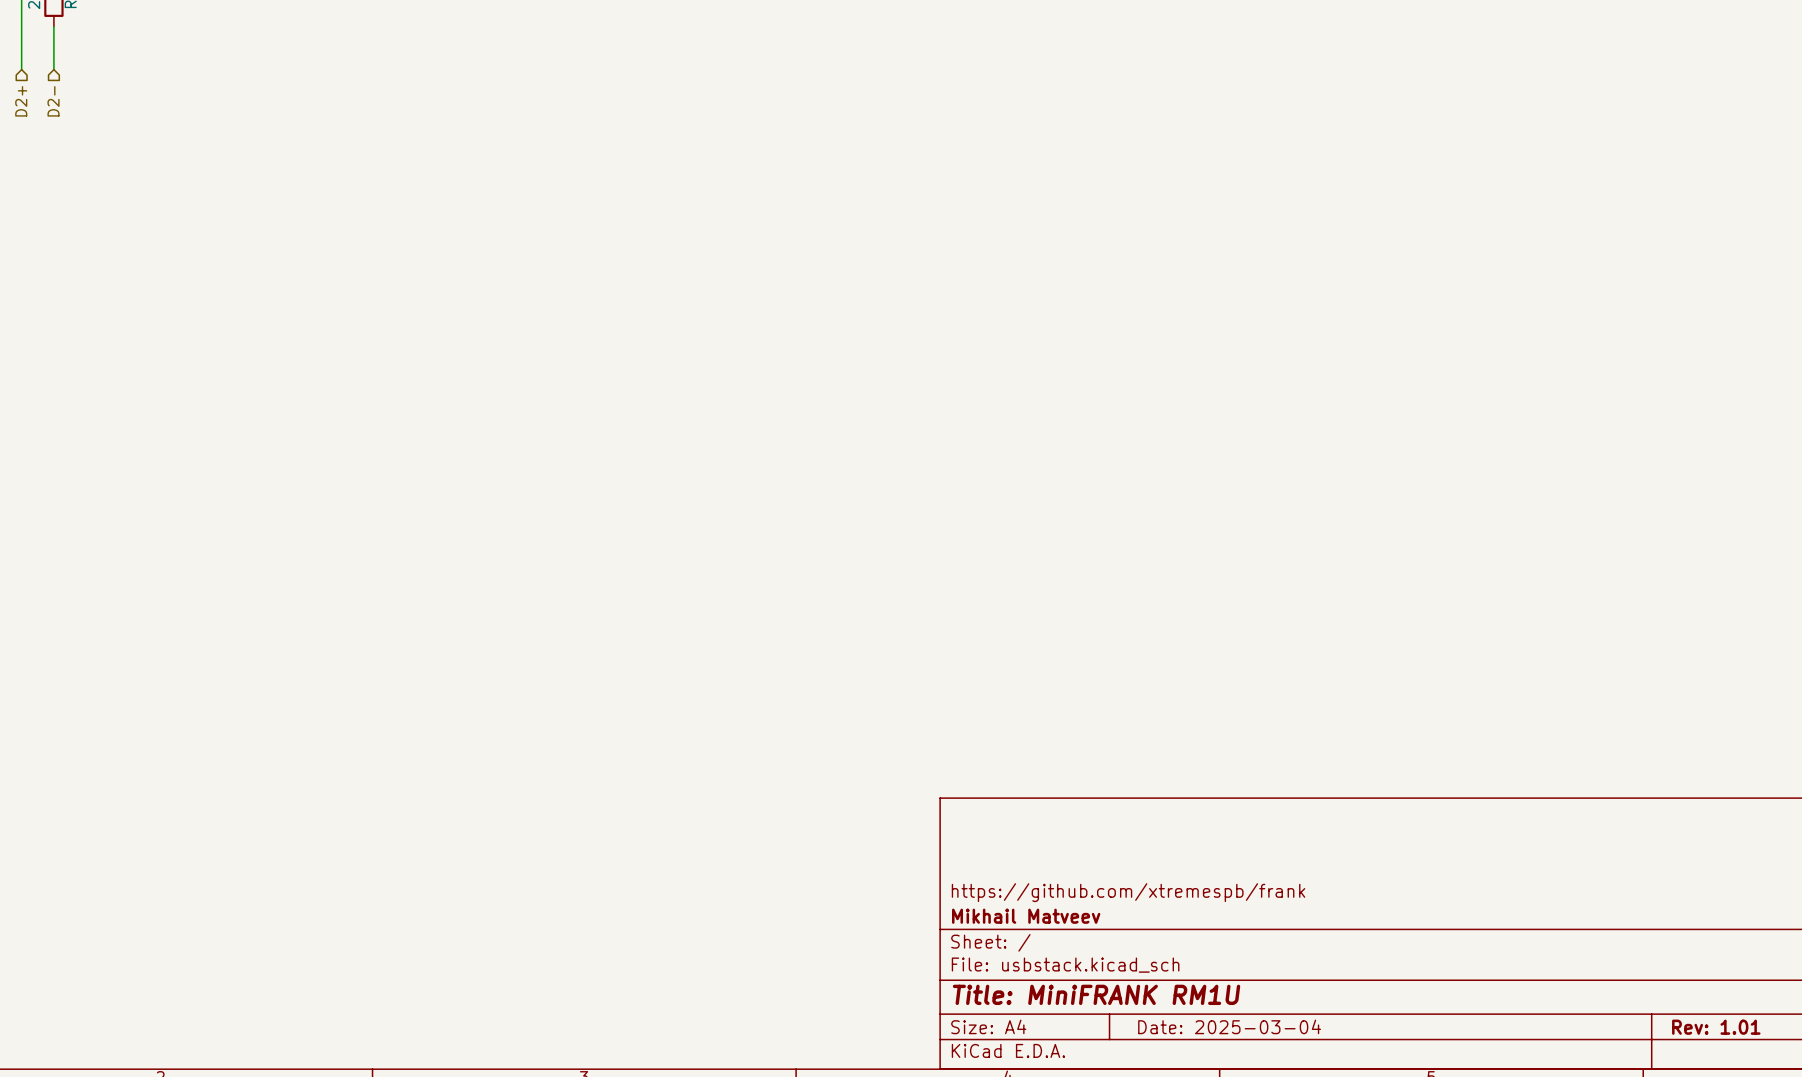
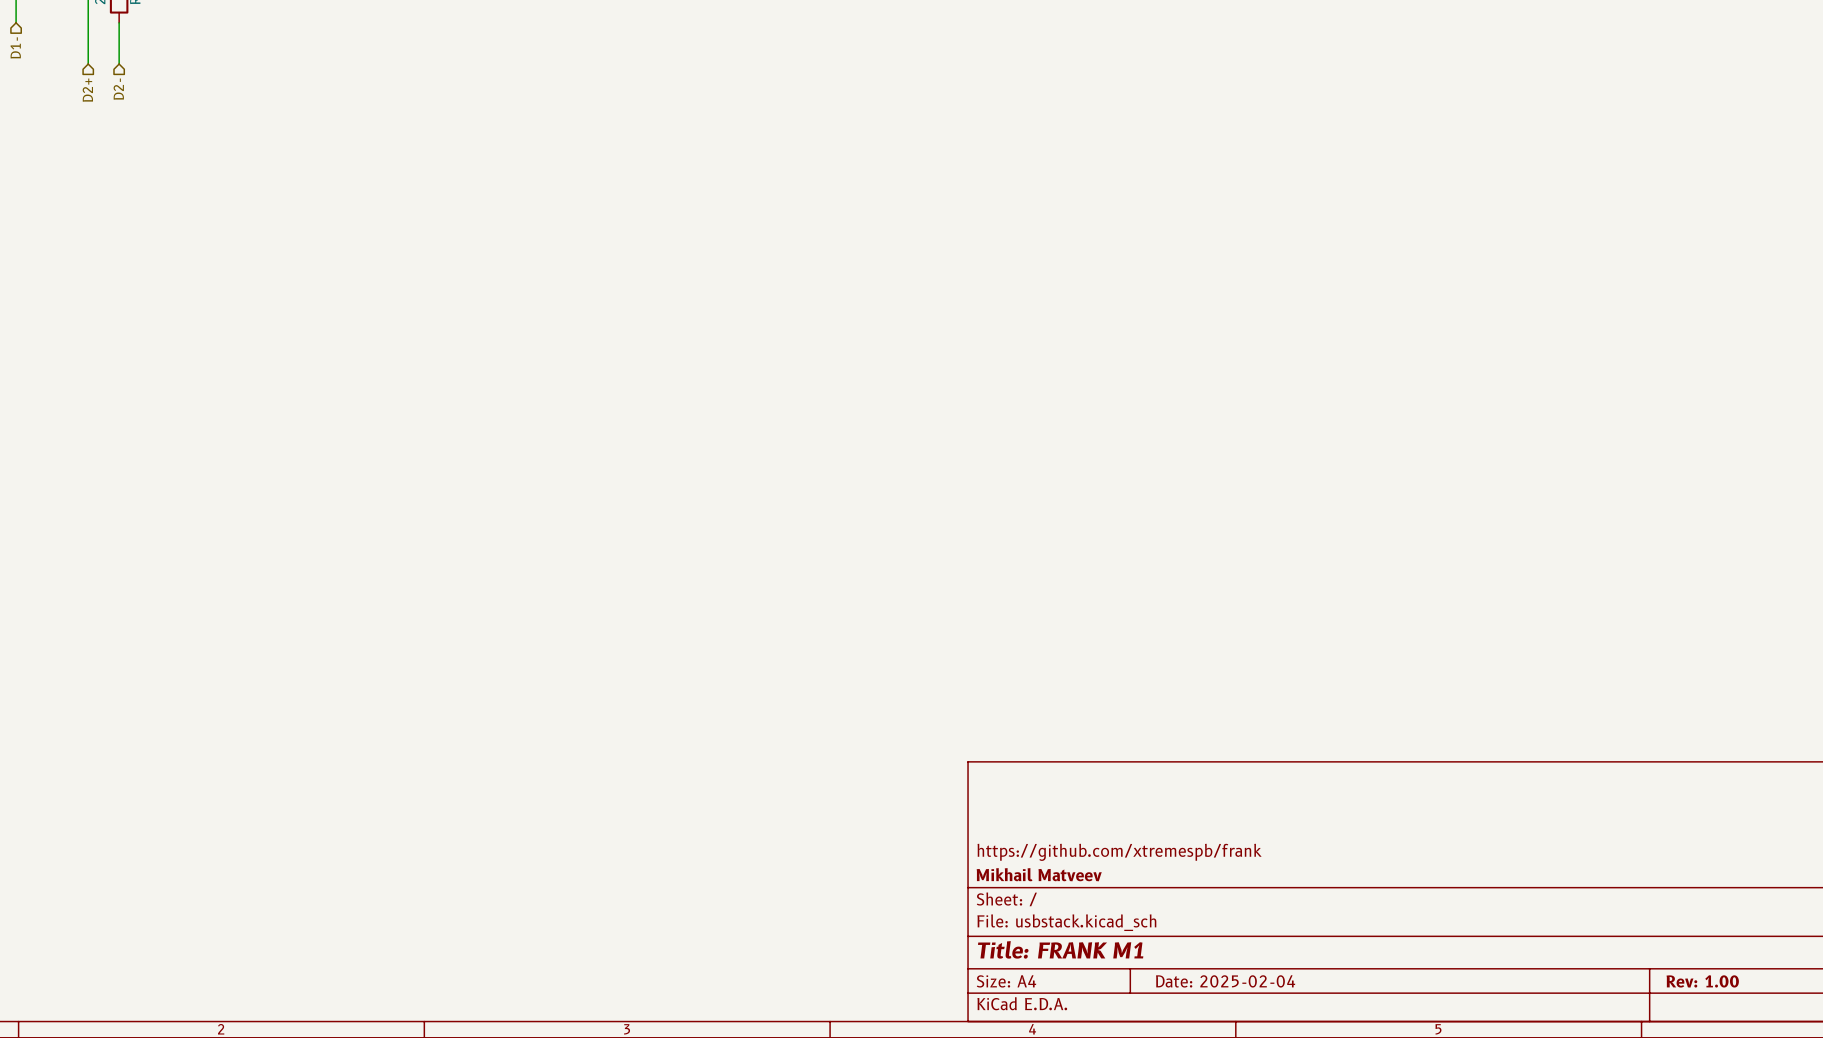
title block: Title: MiniFRANK RM1U (1096, 994) -> Title: FRANK M1 (1060, 949)
title block: Date: 2025-03-04 (1229, 1026) -> Date: 2025-02-04 (1225, 981)
title block: Rev: 1.01 (1716, 1027) -> Rev: 1.00 (1702, 981)

